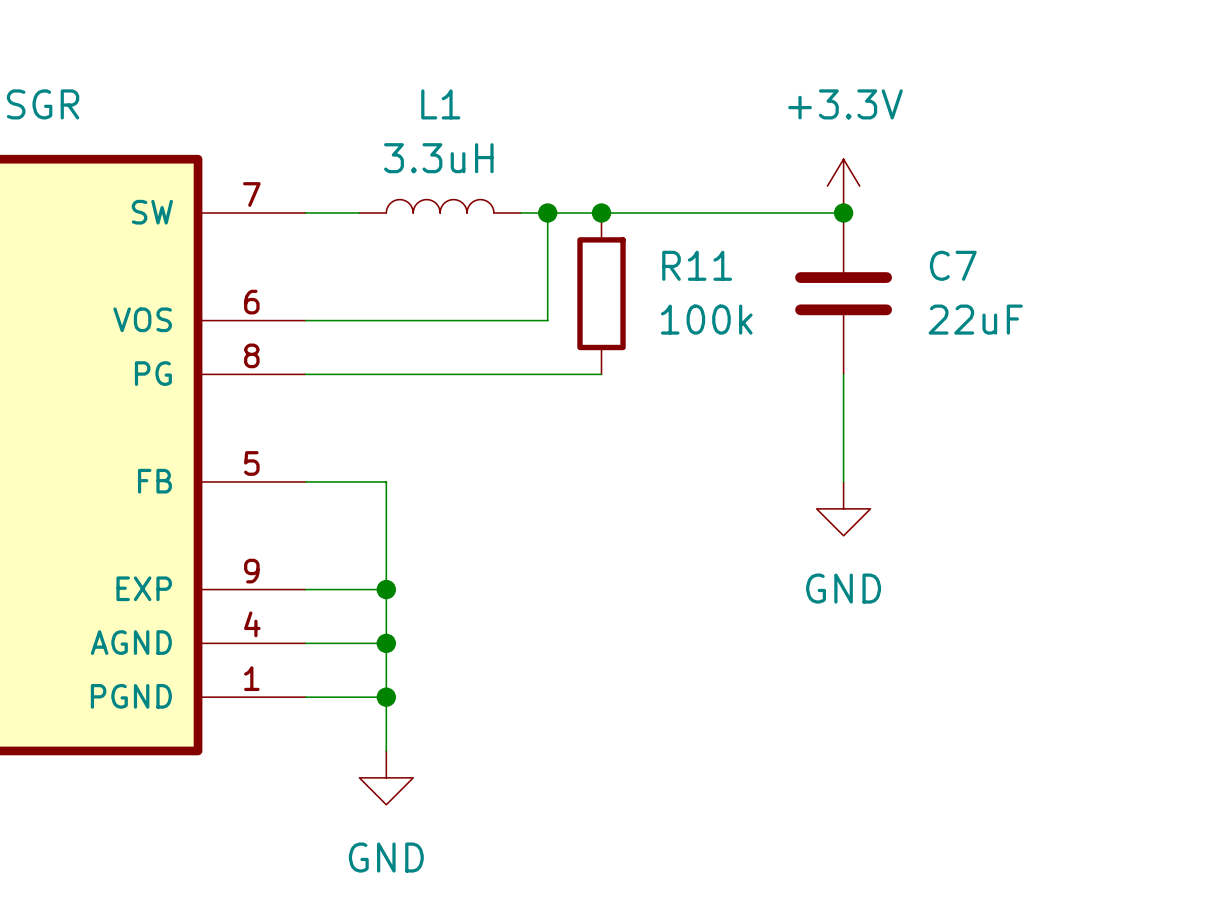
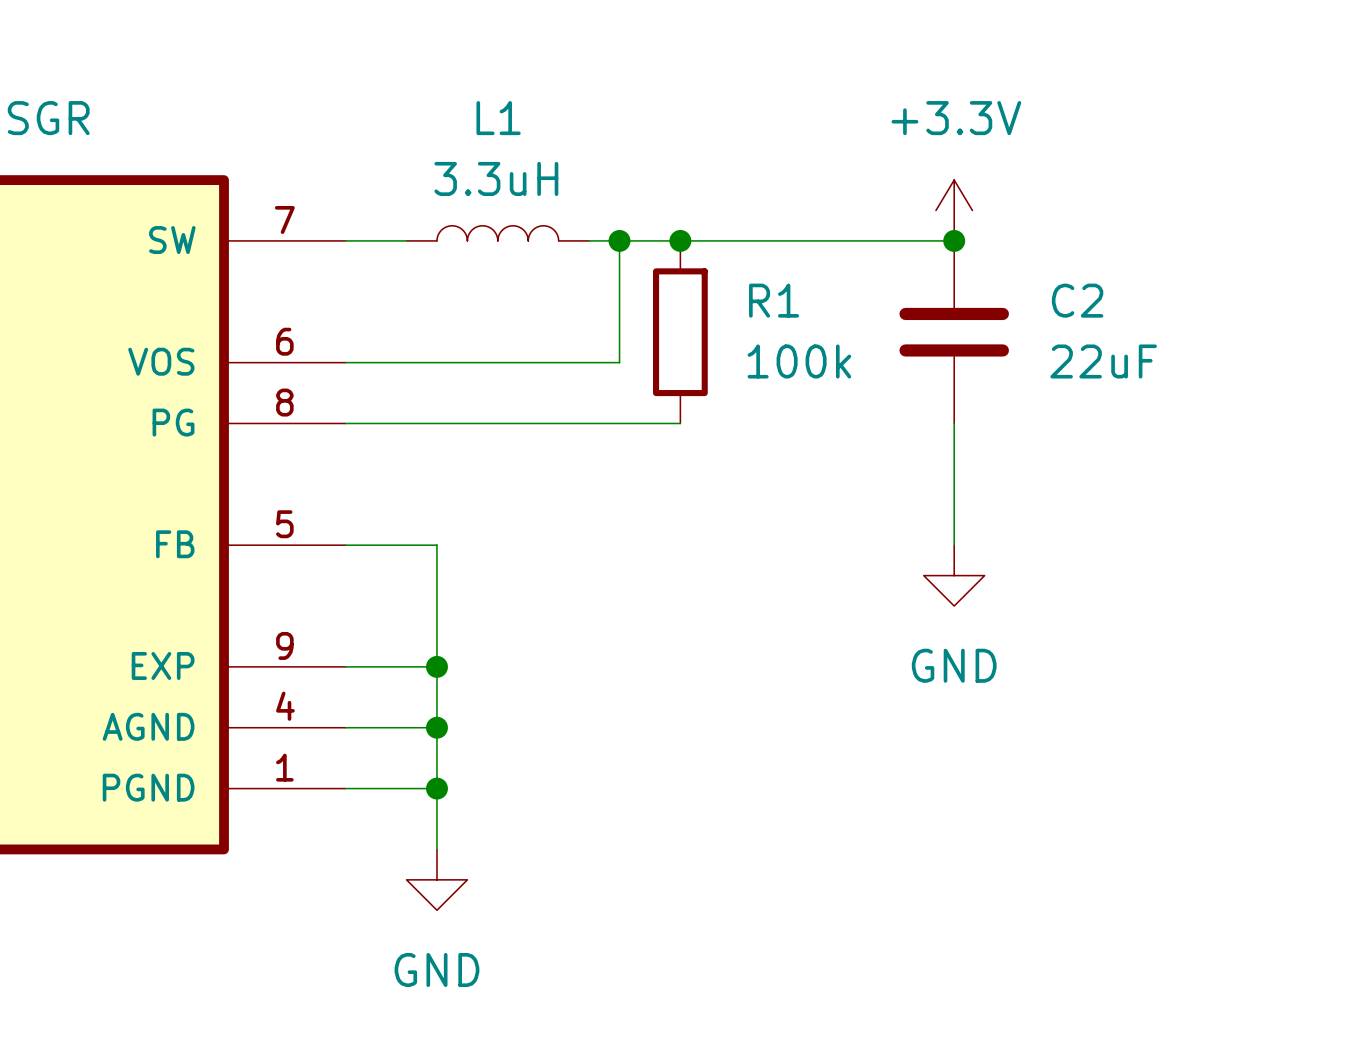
R11 name: R11 (697, 265) -> R1 (774, 300)
C7 name: C7 (953, 265) -> C2 (1077, 300)

